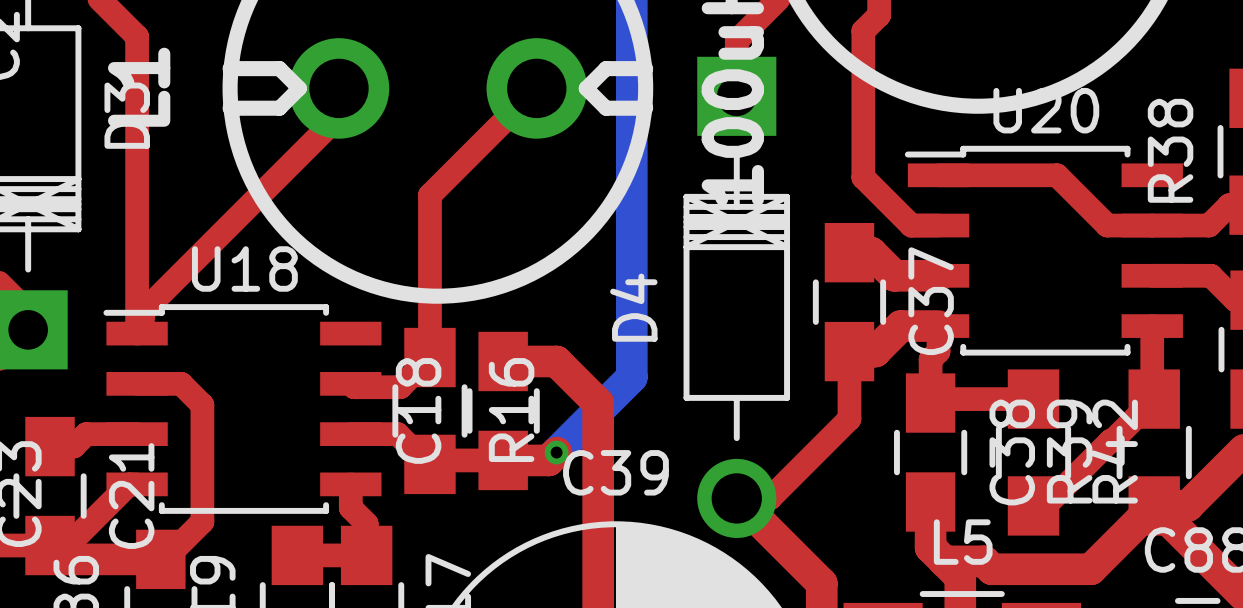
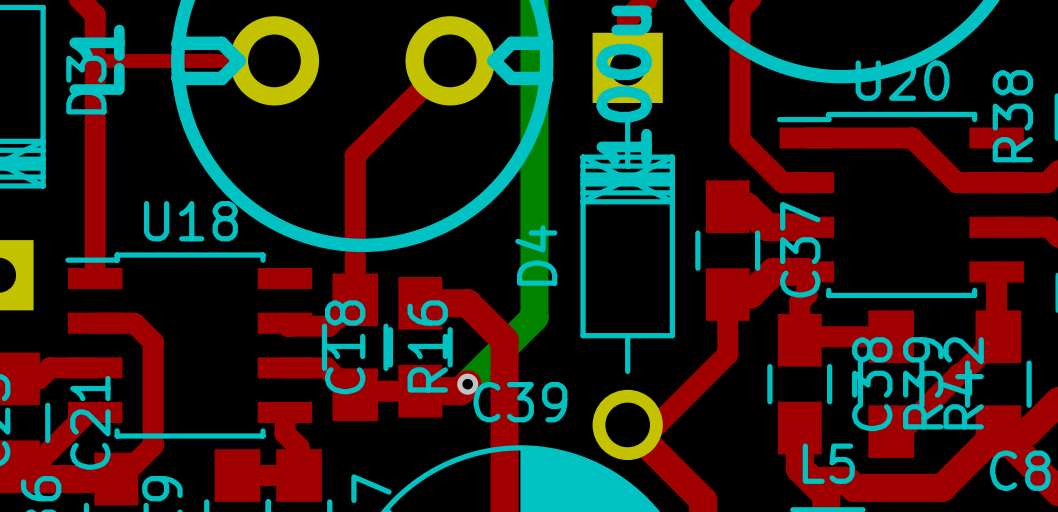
top track: none -> (95, 60) (274, 60)
top track: (338, 116) (143, 312) (143, 319) -> none

